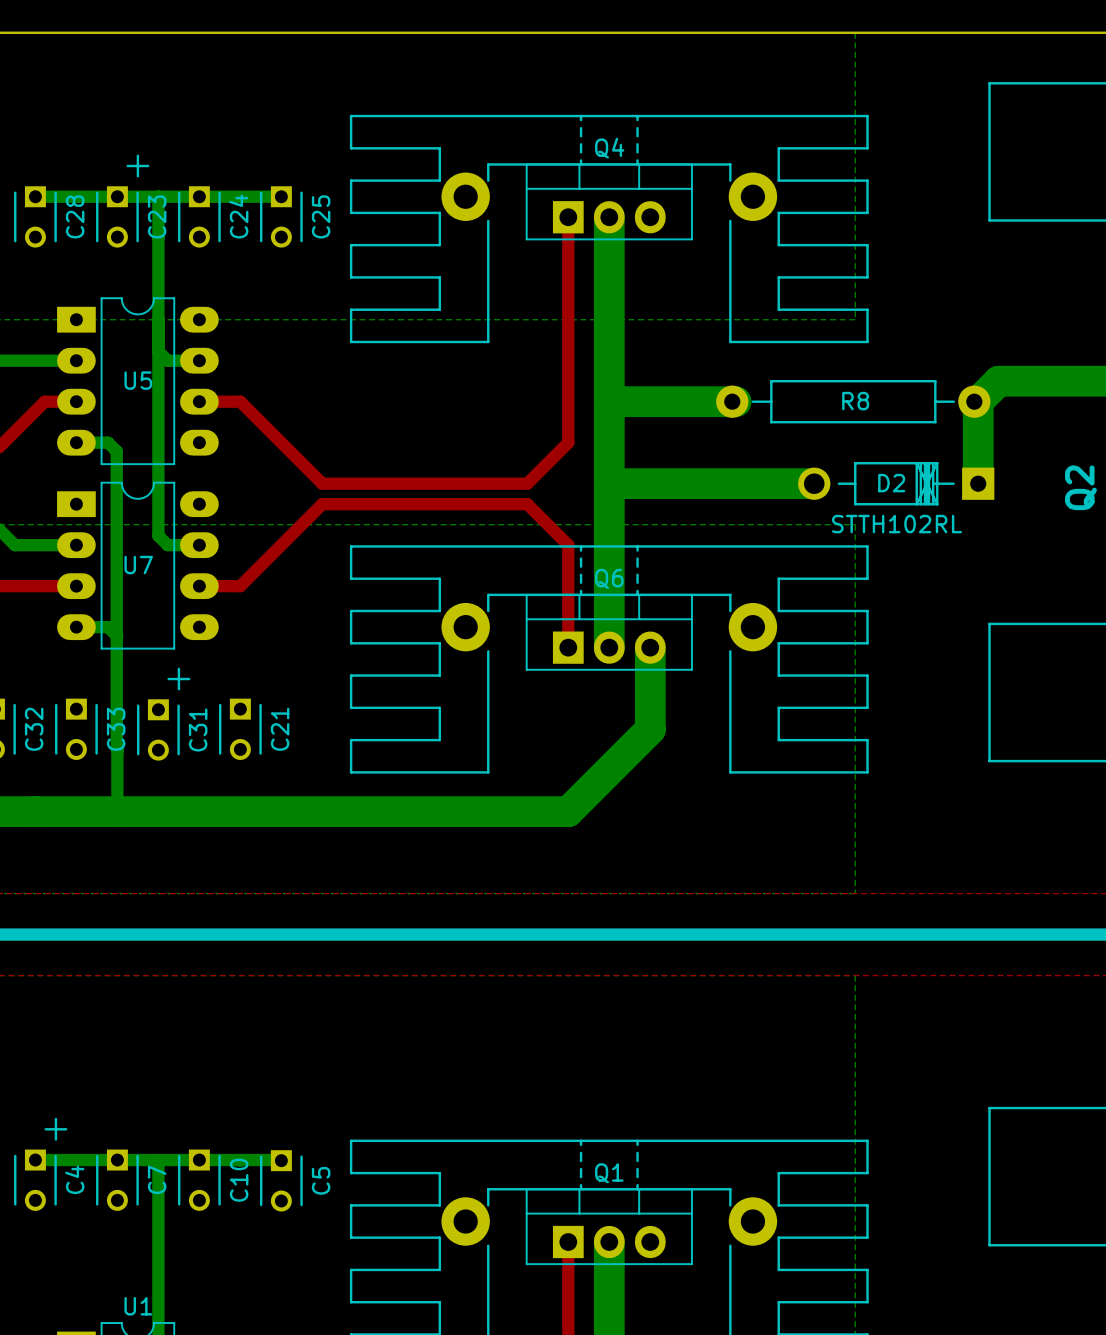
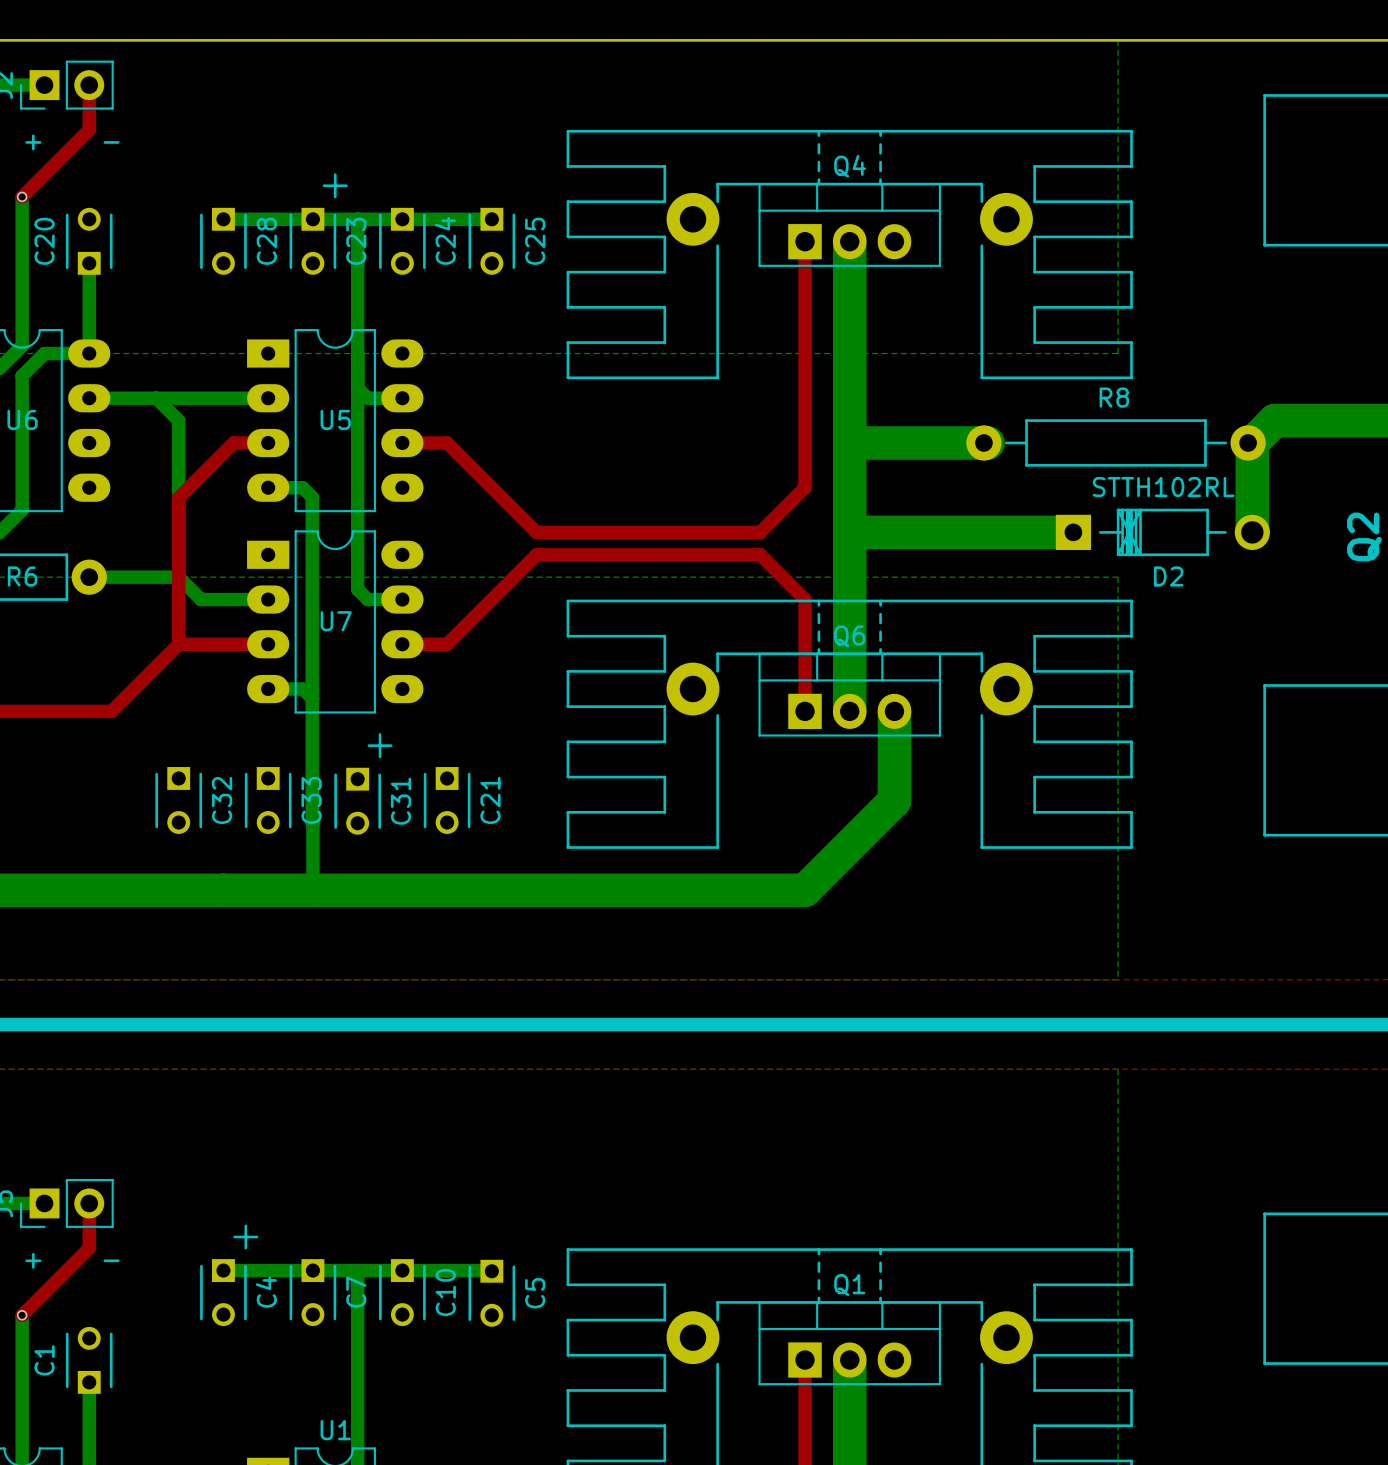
R8 name position: R8 (855, 401) -> R8 (1114, 397)
D2 name position: D2 (891, 483) -> D2 (1168, 576)
D2 rotation: 0° (896, 483) -> 180° (1162, 532)

